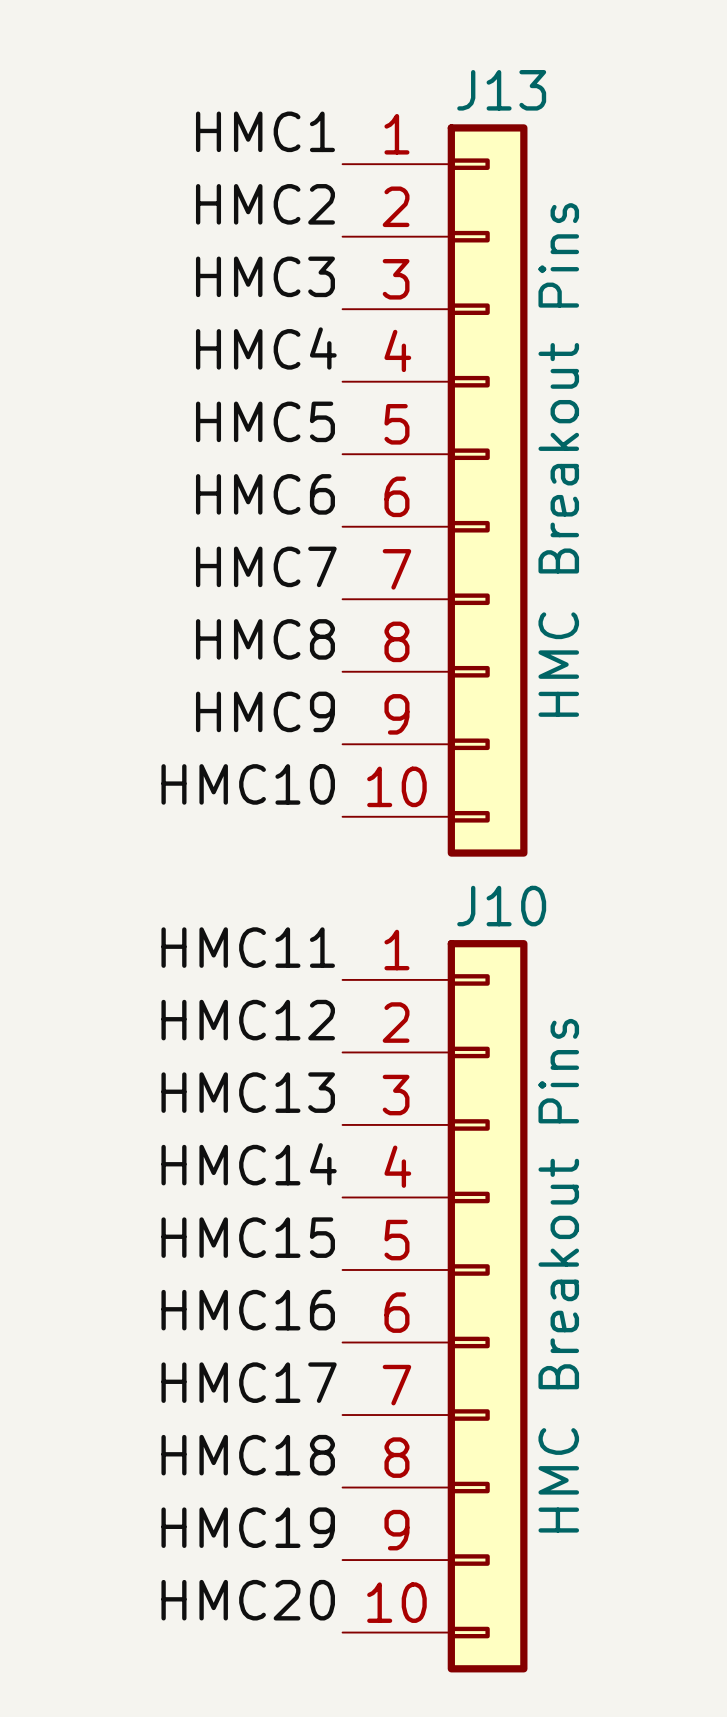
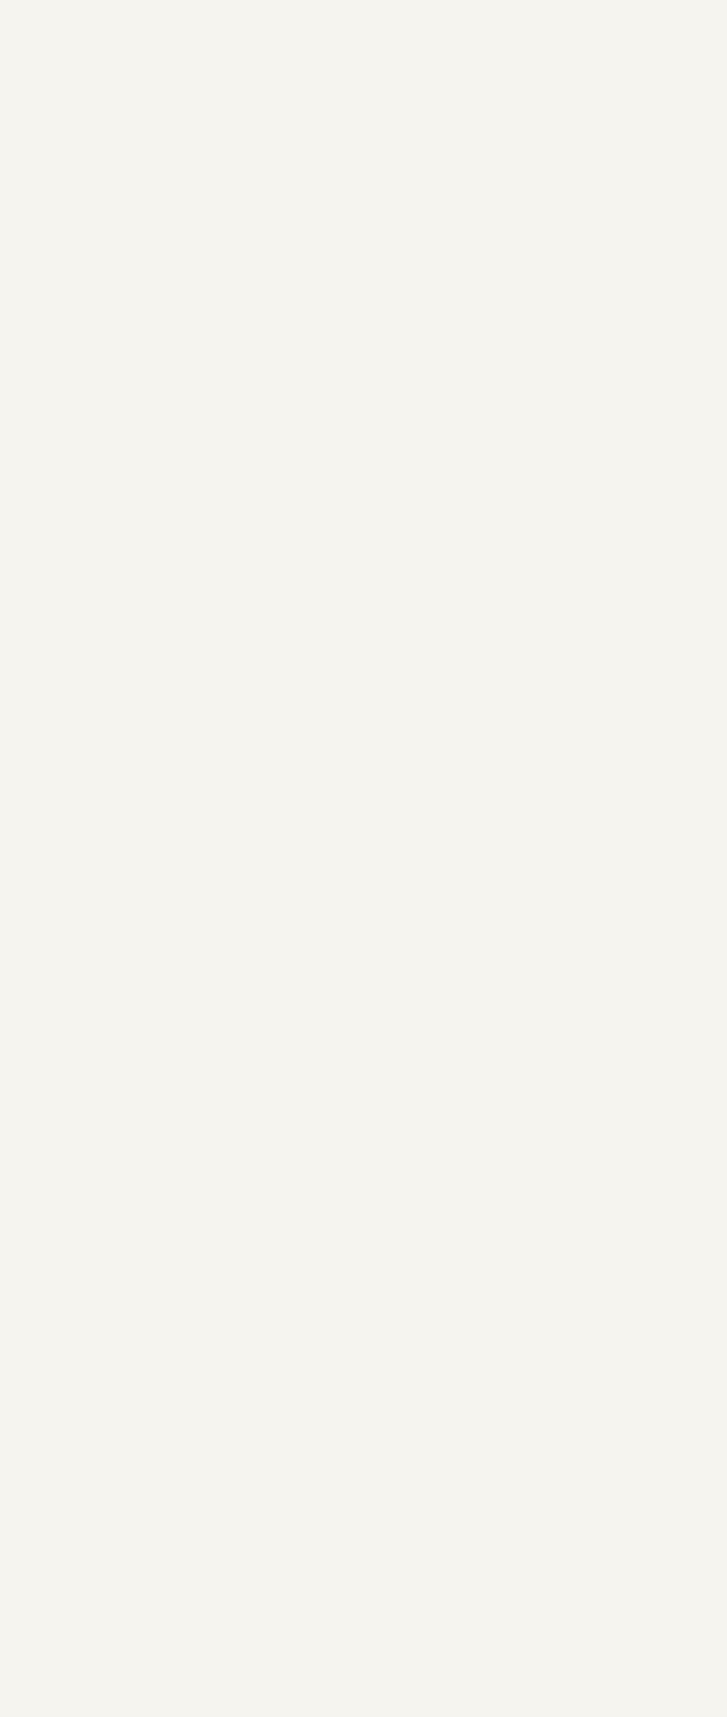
label: HMC1 (265, 131) -> none
label: HMC2 (265, 204) -> none
label: HMC3 (265, 276) -> none
label: HMC4 (266, 348) -> none
label: HMC5 (265, 421) -> none
J13: HMC Breakout Pins (435, 490) -> none
label: HMC6 (265, 494) -> none
label: HMC7 (266, 566) -> none
label: HMC8 (265, 639) -> none
label: HMC9 (265, 711) -> none
label: HMC10 (248, 784) -> none
label: HMC11 (248, 947) -> none
label: HMC12 (248, 1020) -> none
label: HMC13 (248, 1092) -> none
label: HMC14 (249, 1164) -> none
label: HMC15 (248, 1237) -> none
J10: HMC Breakout Pins (435, 1306) -> none
label: HMC16 (248, 1310) -> none
label: HMC17 (249, 1382) -> none
label: HMC18 (248, 1455) -> none
label: HMC19 (248, 1527) -> none
label: HMC20 (248, 1600) -> none

